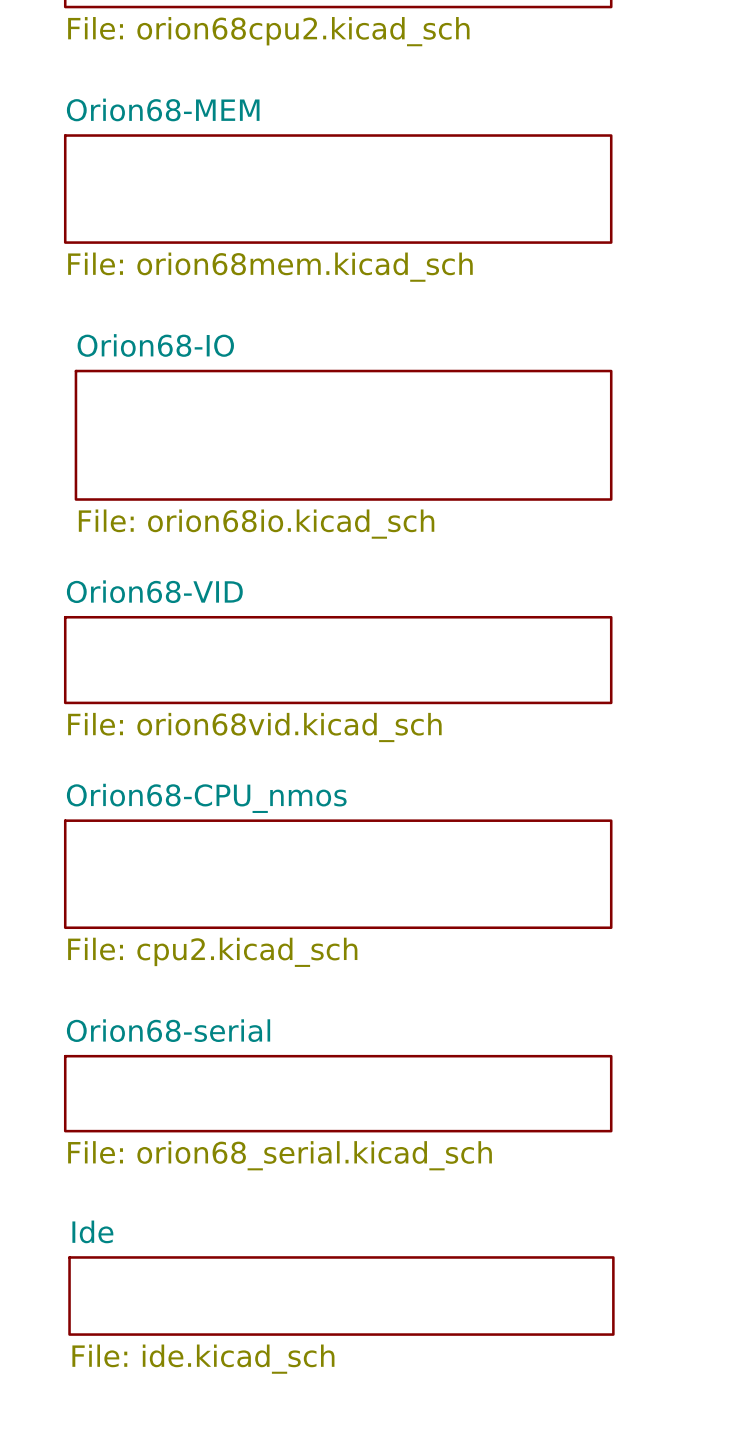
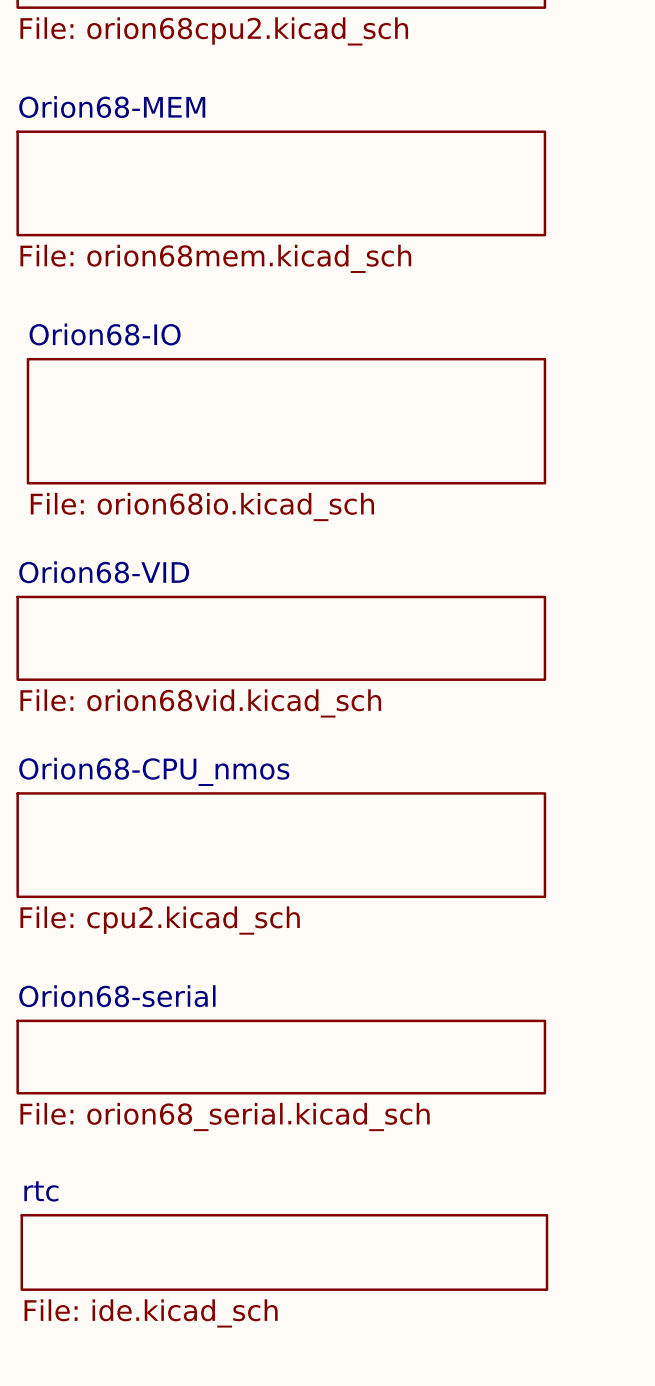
sheet Ide name: Ide (92, 1231) -> rtc (41, 1191)

